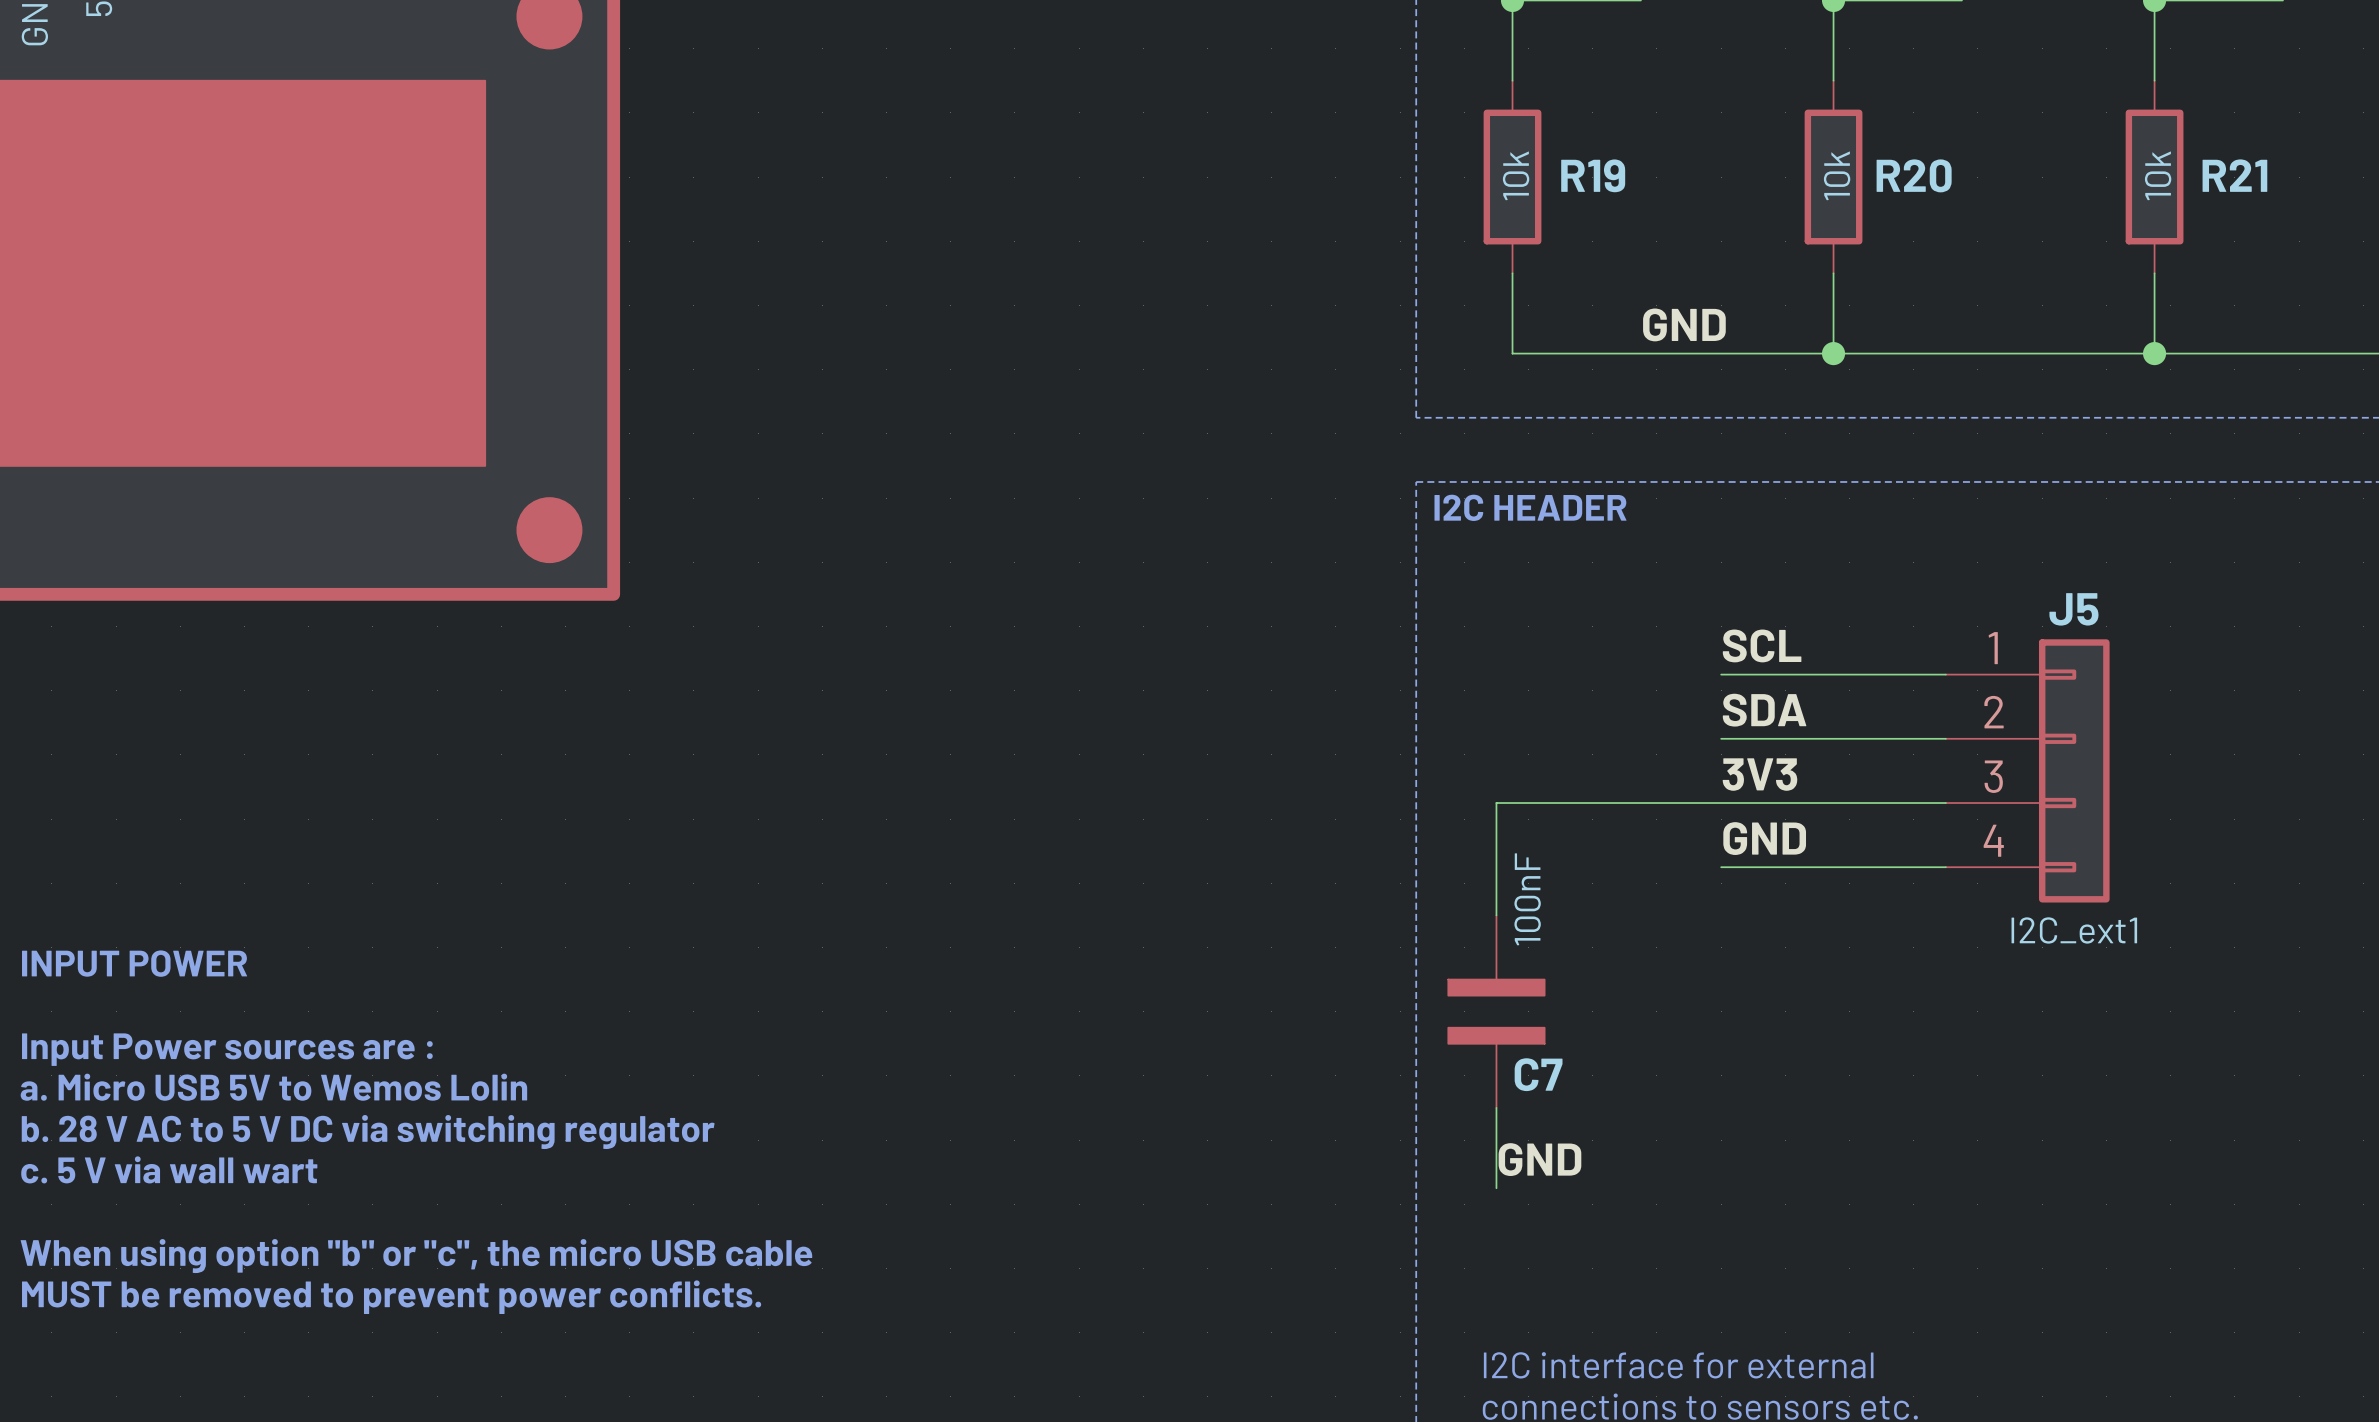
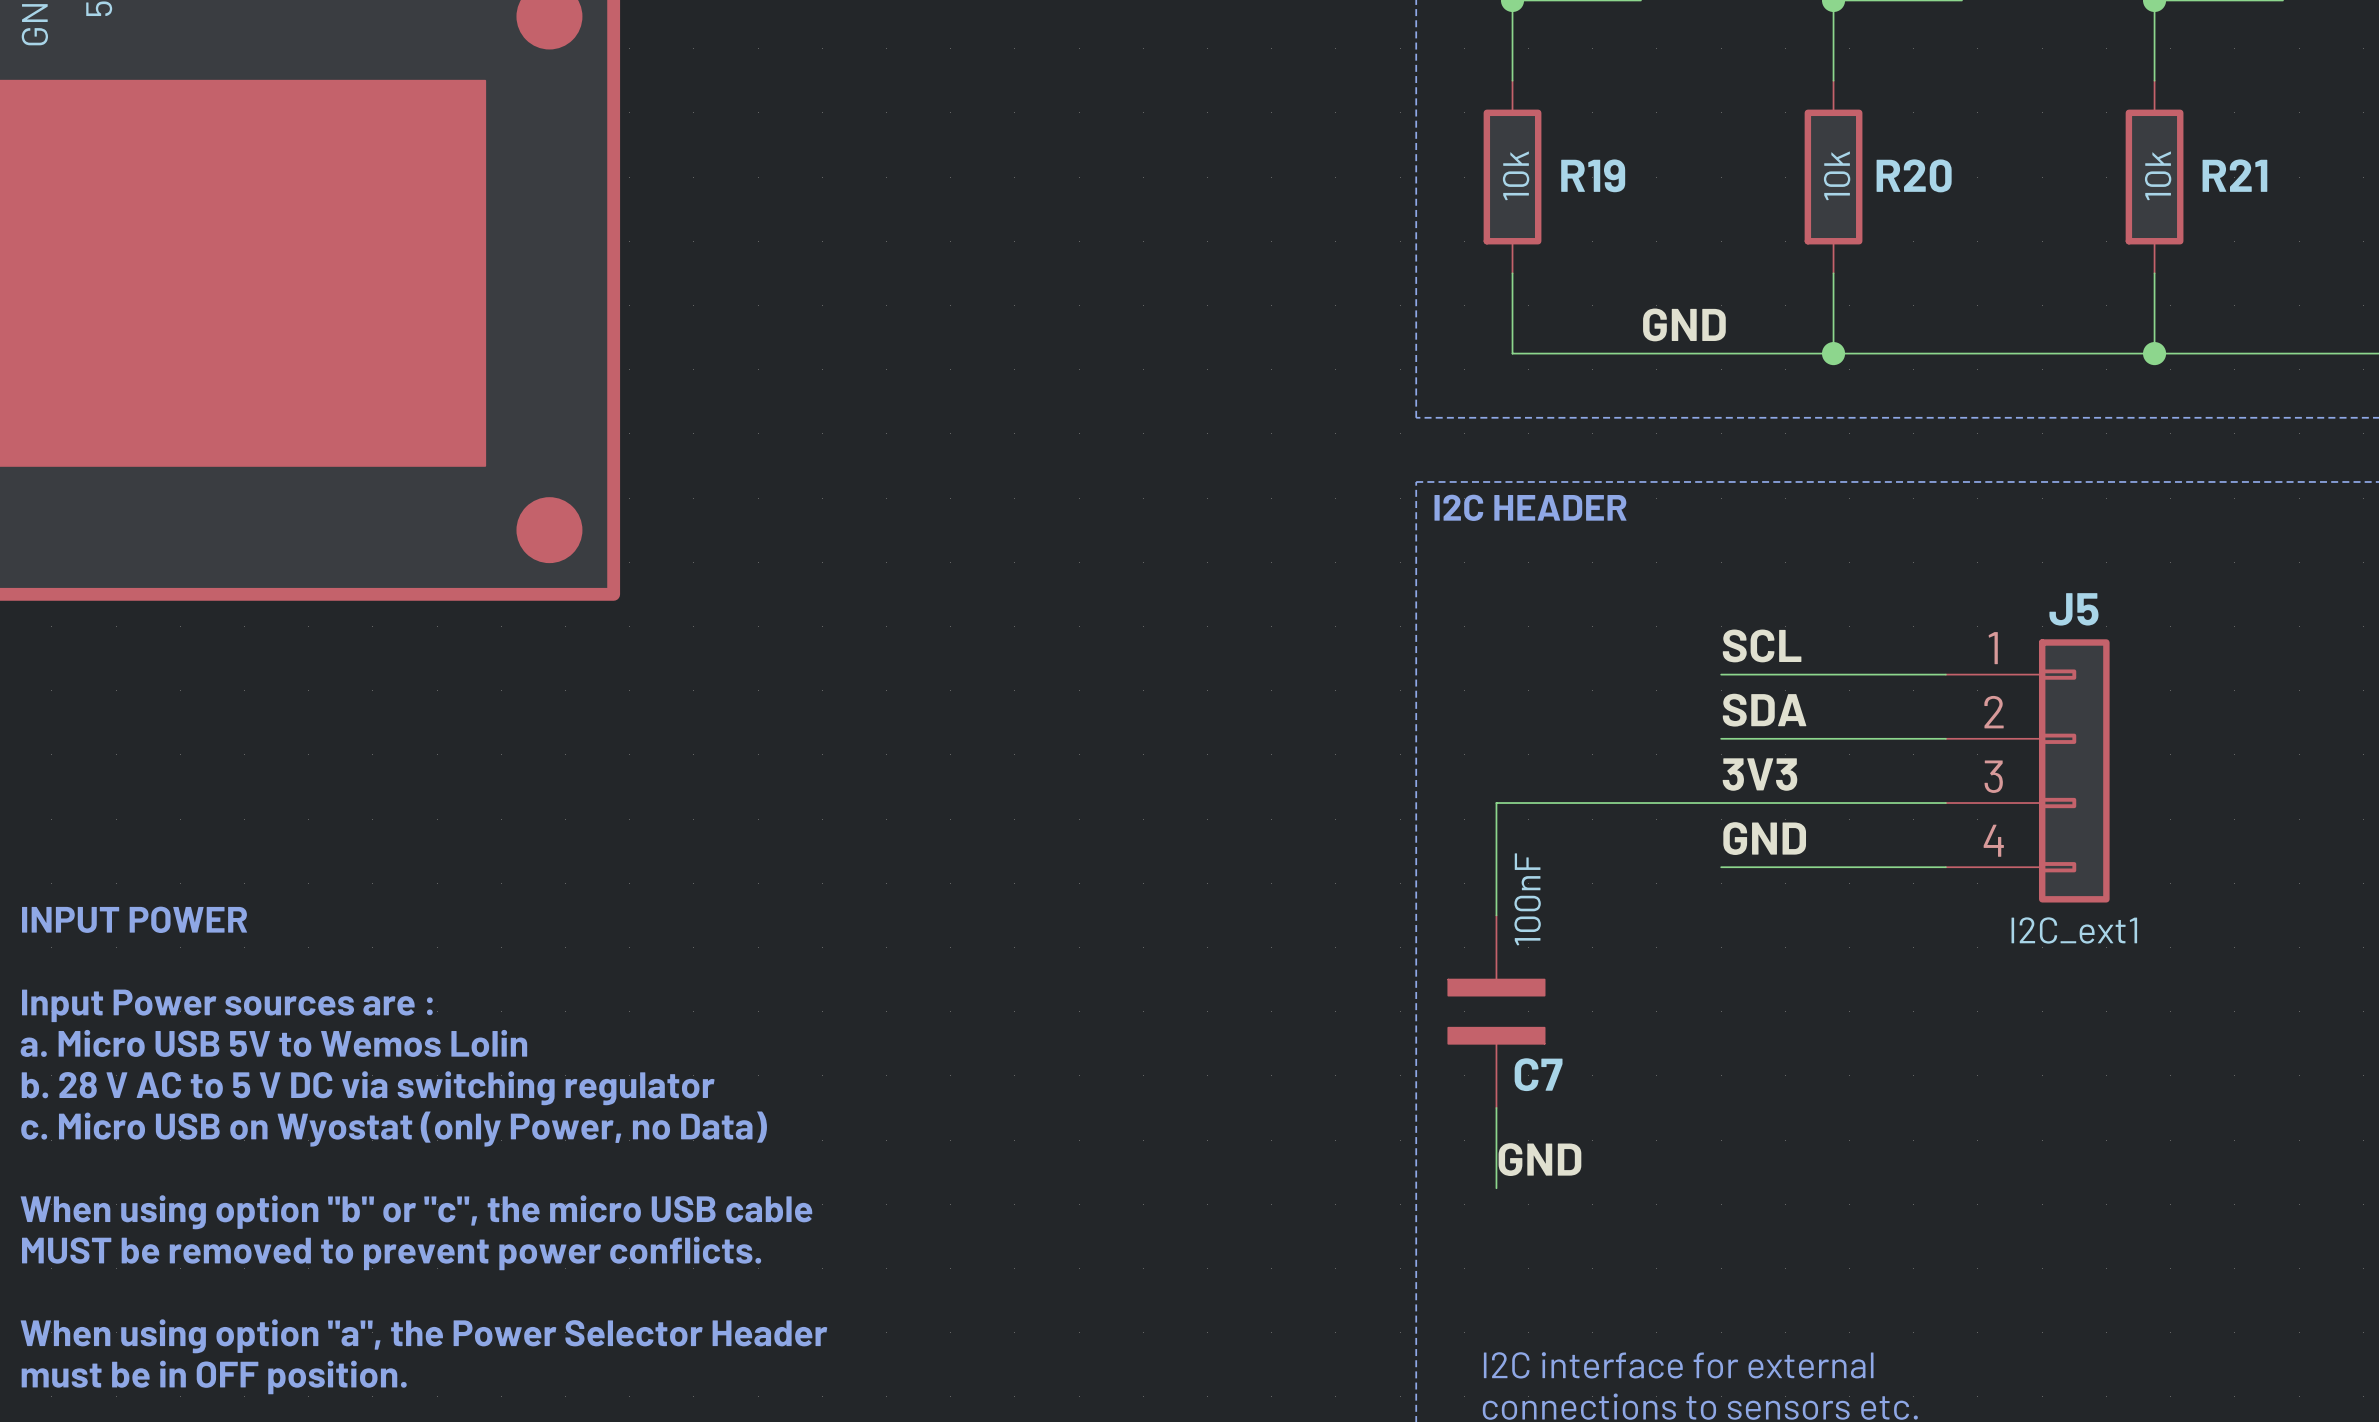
text position: INPUT POWER (134, 963) -> INPUT POWER (134, 919)
text: none -> Input Power sources are : (227, 1005)
text: Input Power sources are : (227, 1049) -> a. Micro USB 5V to Wemos Lolin (273, 1043)
text: a. Micro USB 5V to Wemos Lolin (273, 1087) -> b. 28 V AC to 5 V DC via switching regulator (368, 1088)
text: b. 28 V AC to 5 V DC via switching regulator (368, 1132) -> c. Micro USB on Wyostat (only Power, no Data) (394, 1129)
text: c. 5 V via wall wart (169, 1169) -> none
text: none -> When using option "b" or "c", the micro USB cable (416, 1212)
text: When using option "b" or "c", the micro USB cable (416, 1256) -> MUST be removed to prevent power conflicts. (391, 1253)
text: MUST be removed to prevent power conflicts. (391, 1297) -> none
text: none -> When using option "a", the Power Selector Header (423, 1336)
text: none -> must be in OFF position. (214, 1377)

